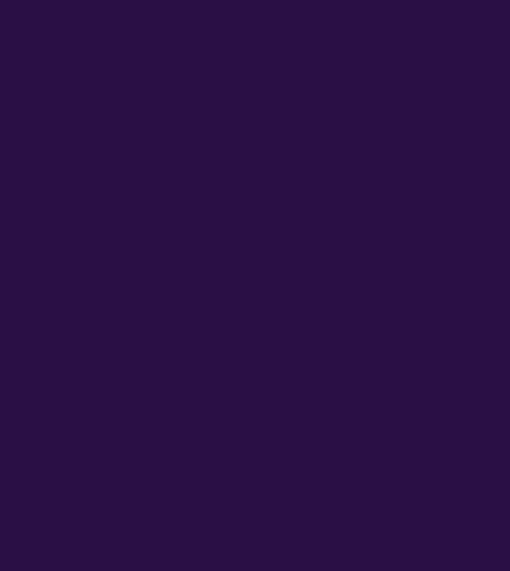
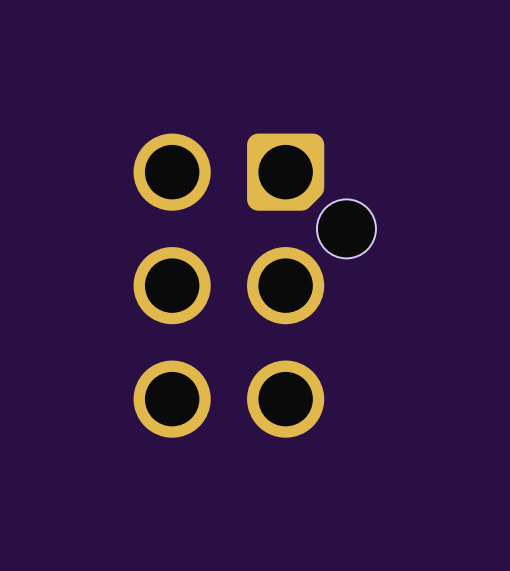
part: none -> (254, 285)

